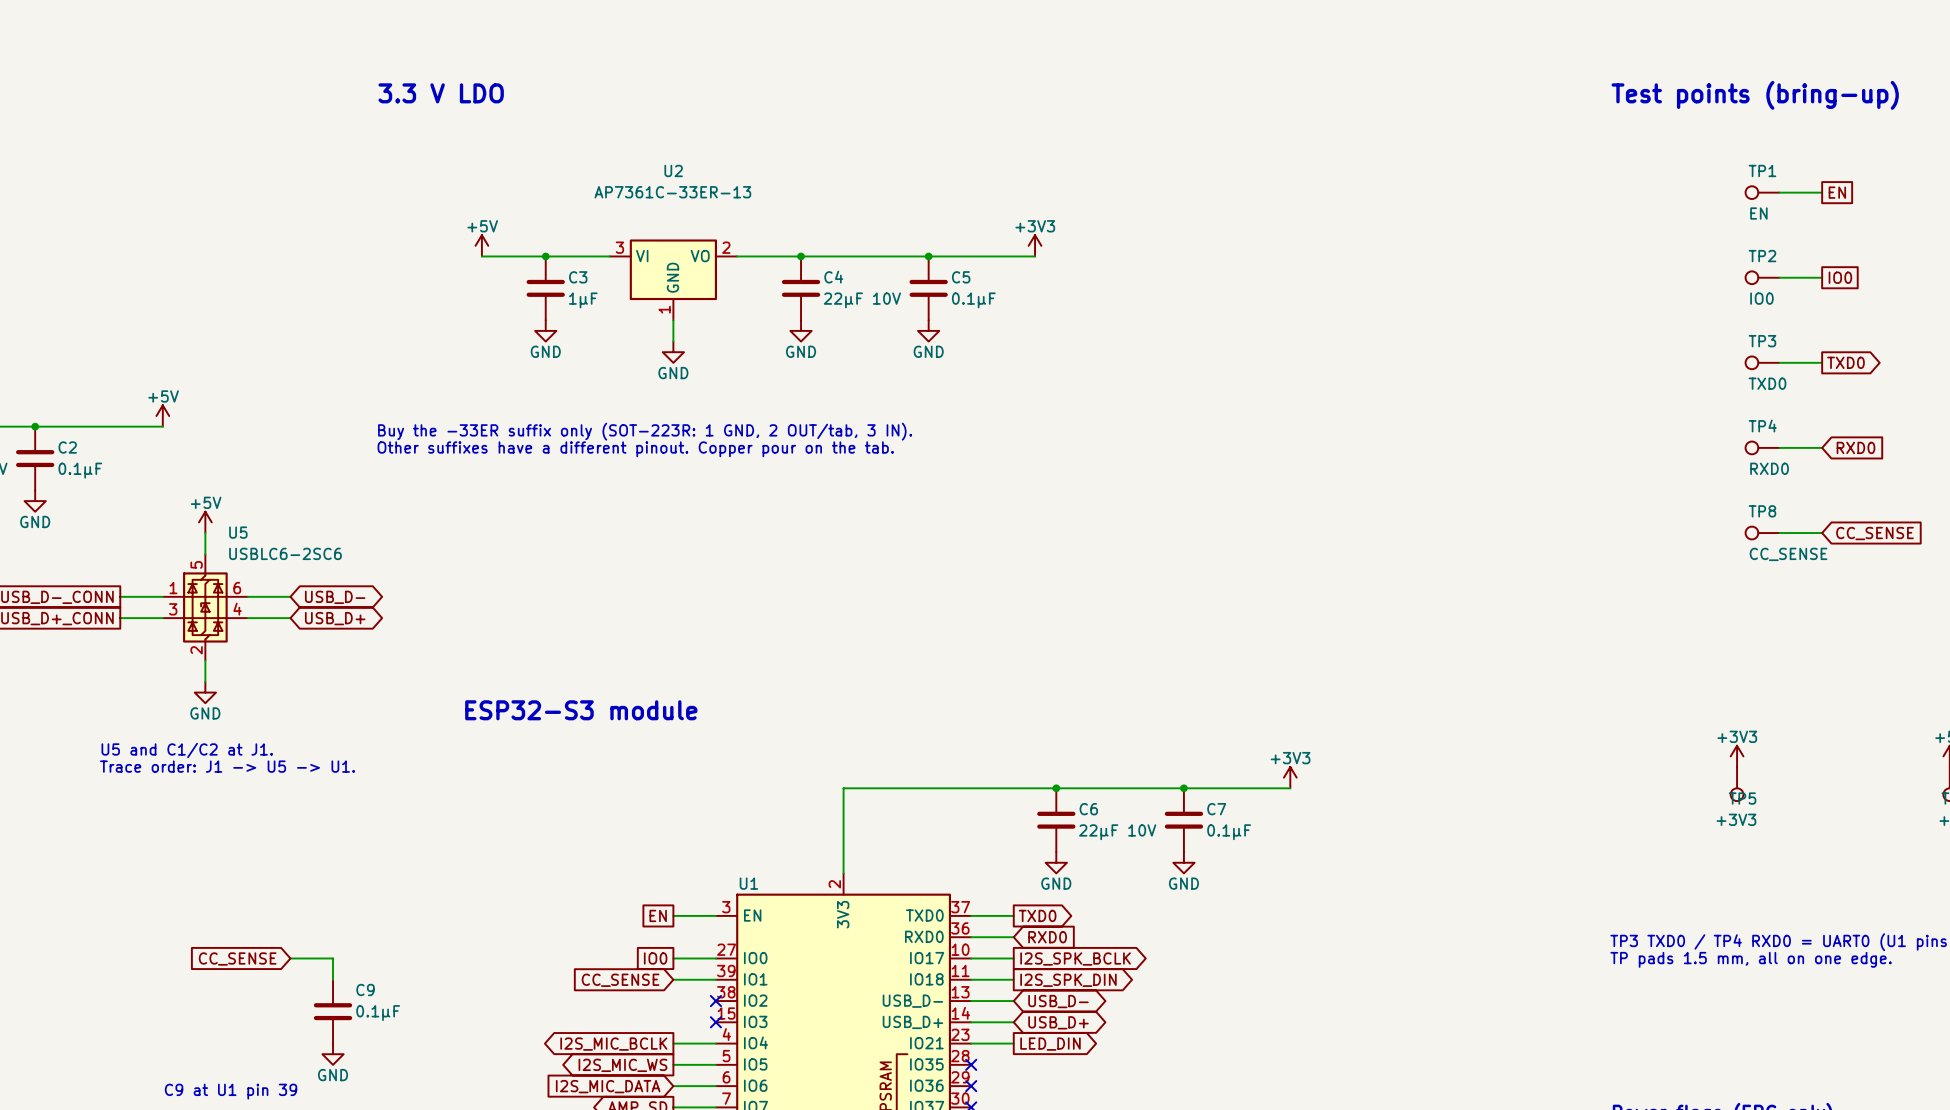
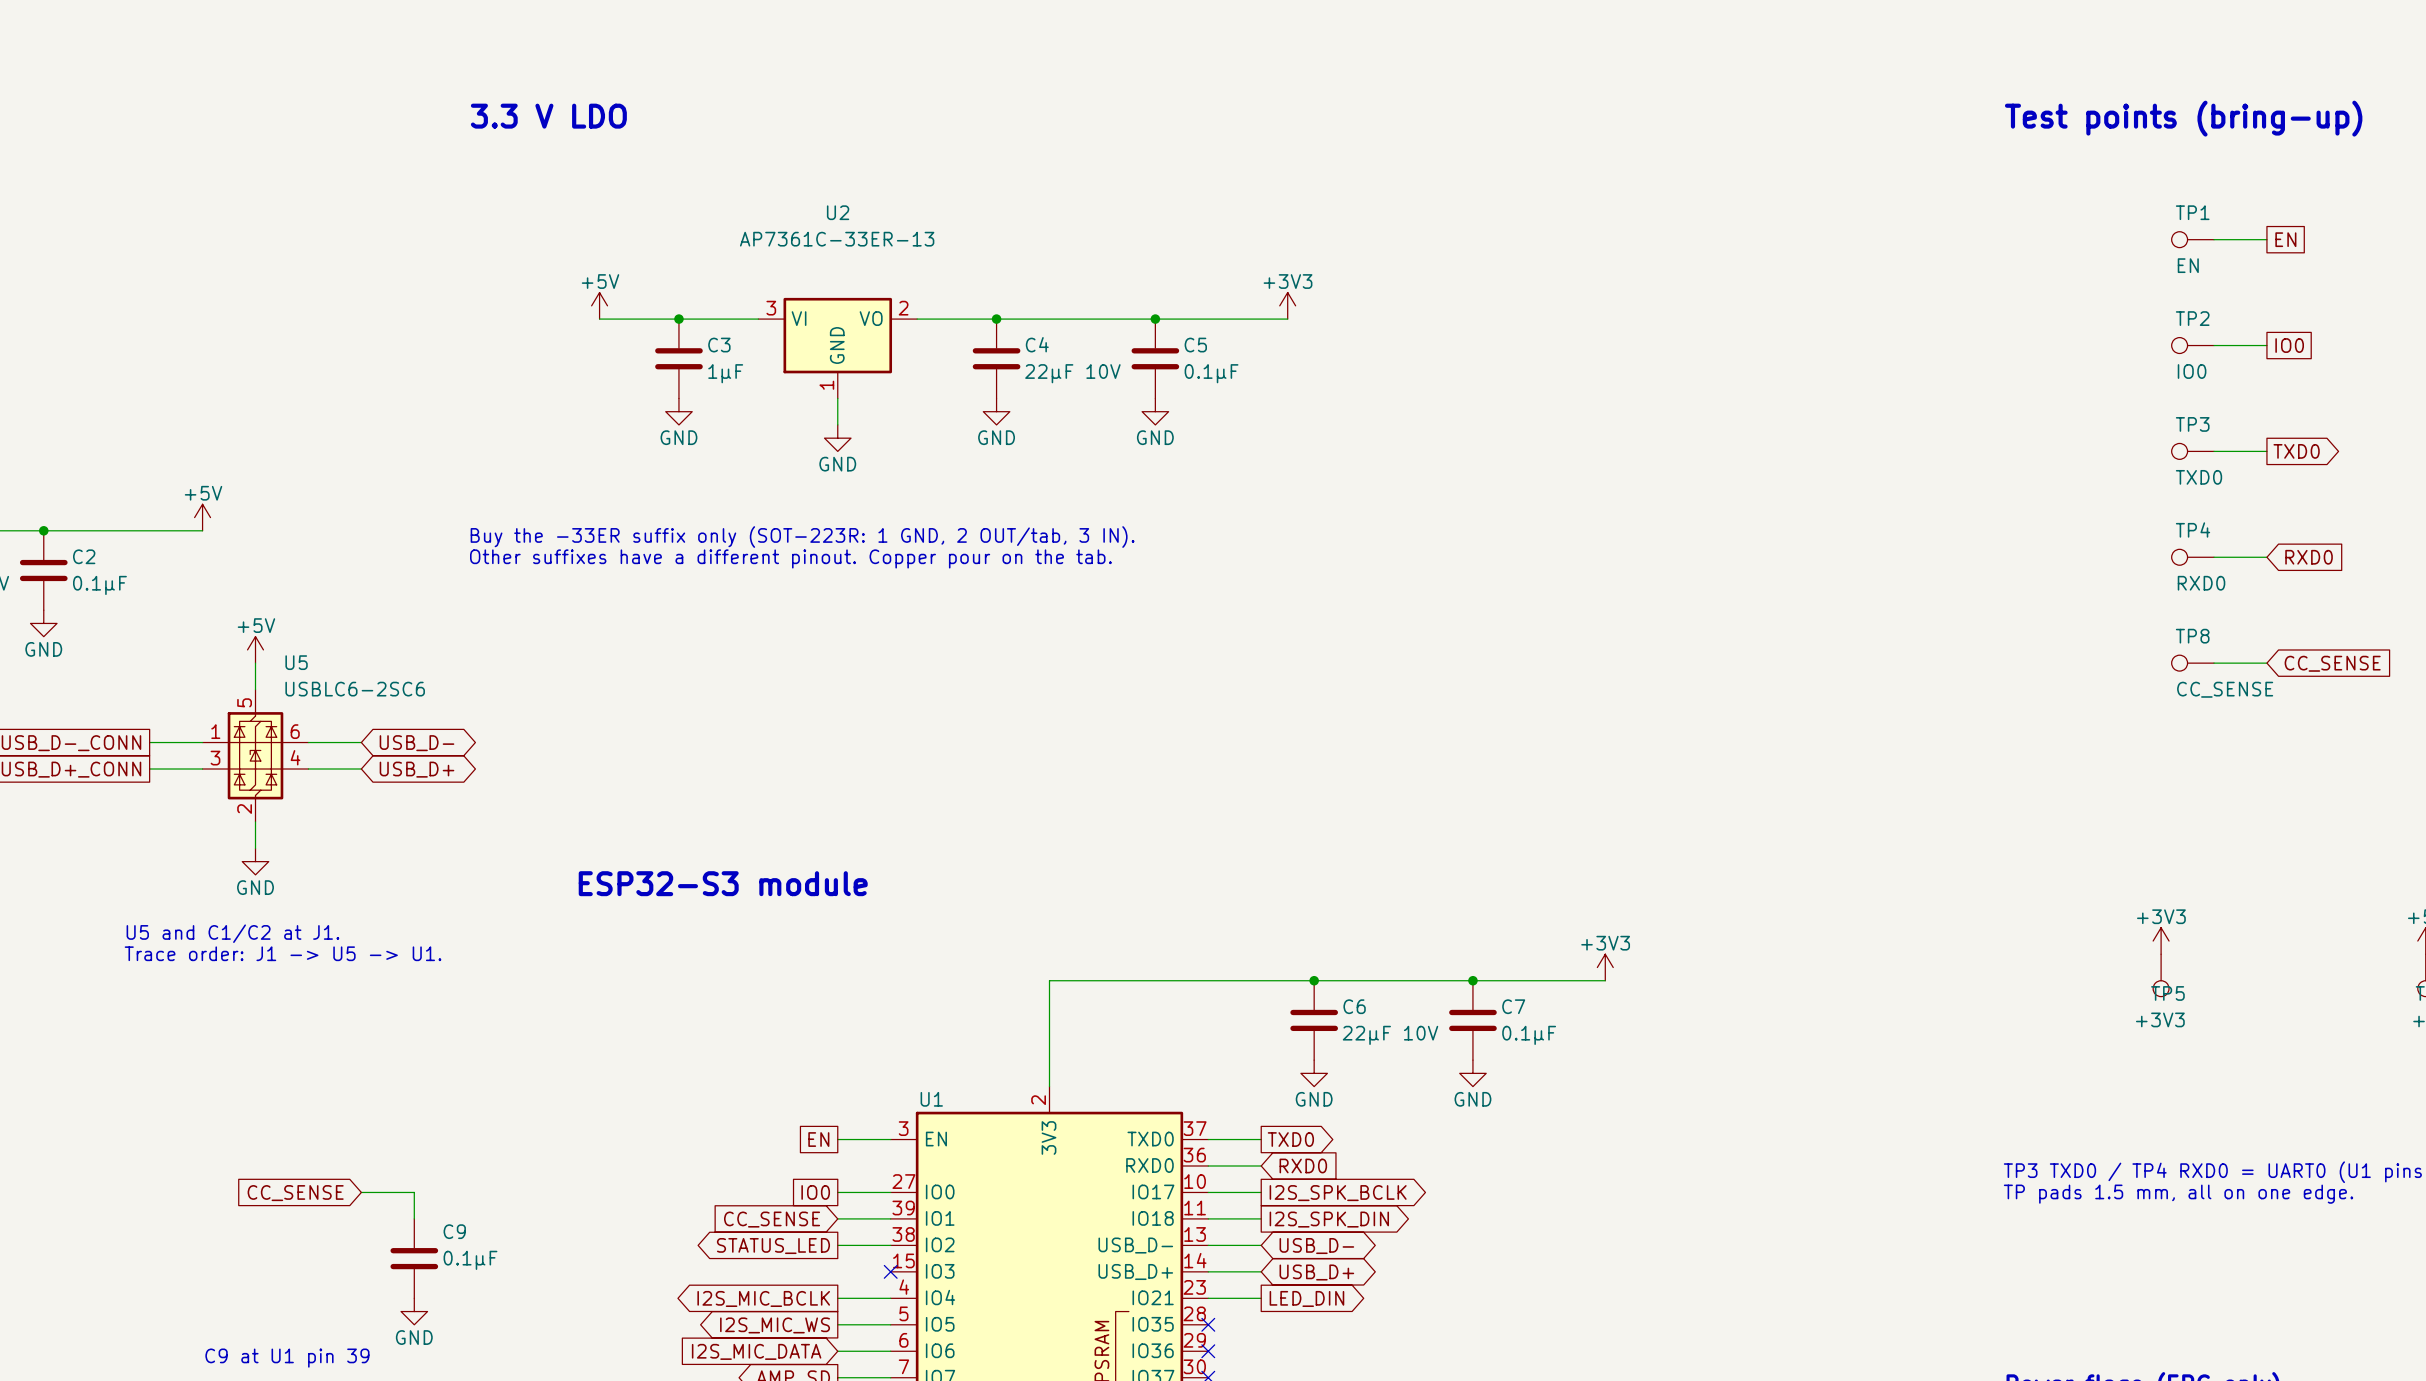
global label: none -> STATUS_LED (773, 1246)
wire: none -> (837, 1245) (890, 1245)
no-connect mark: (715, 1001) -> none

